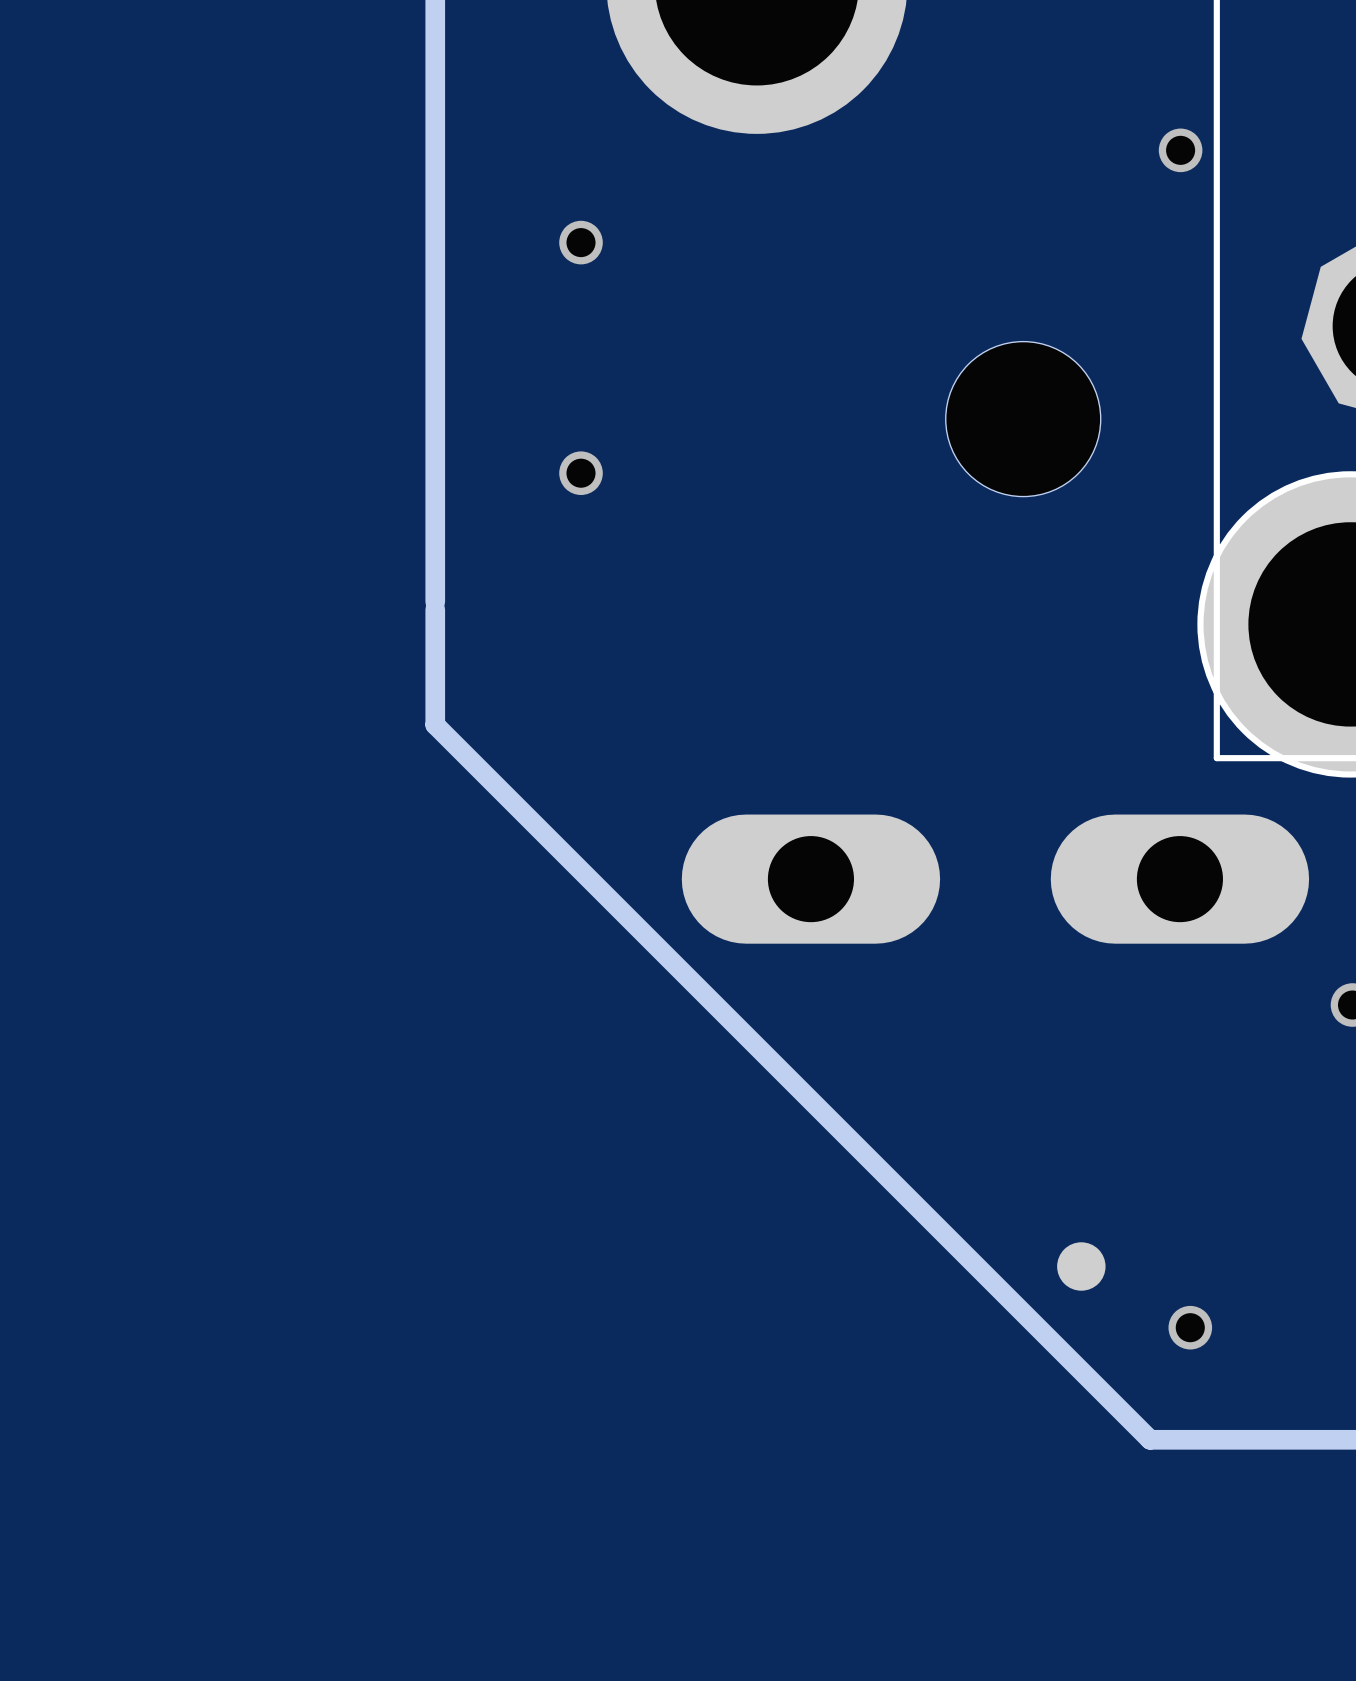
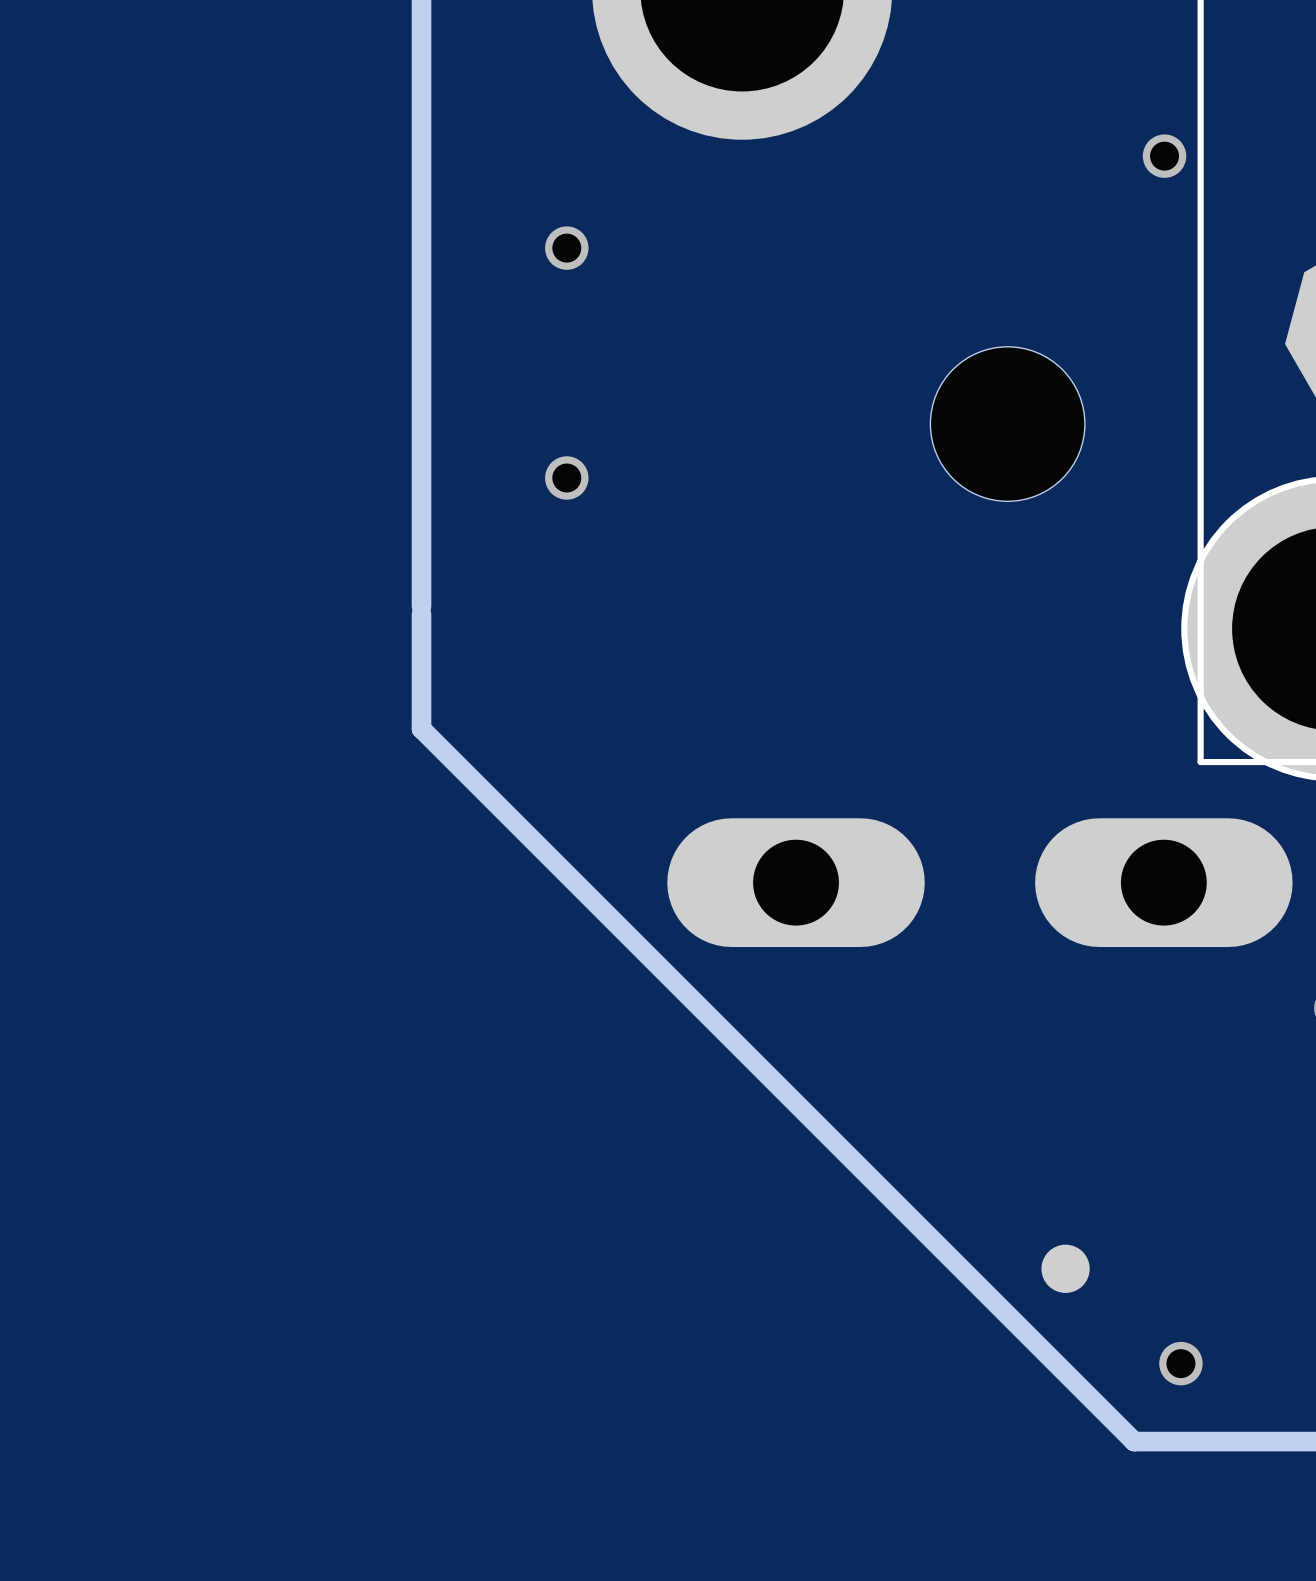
via position: (1190, 1327) -> (1180, 1363)

